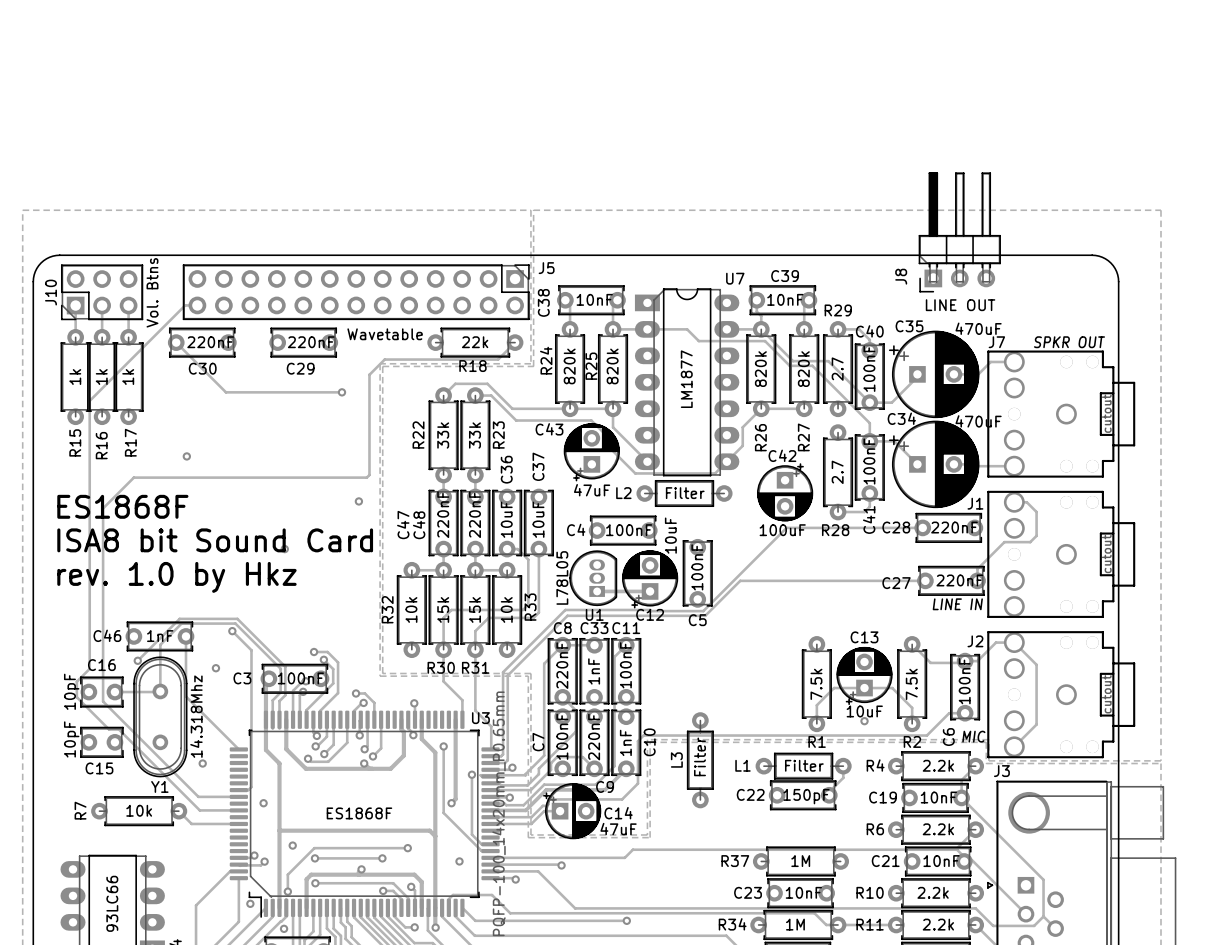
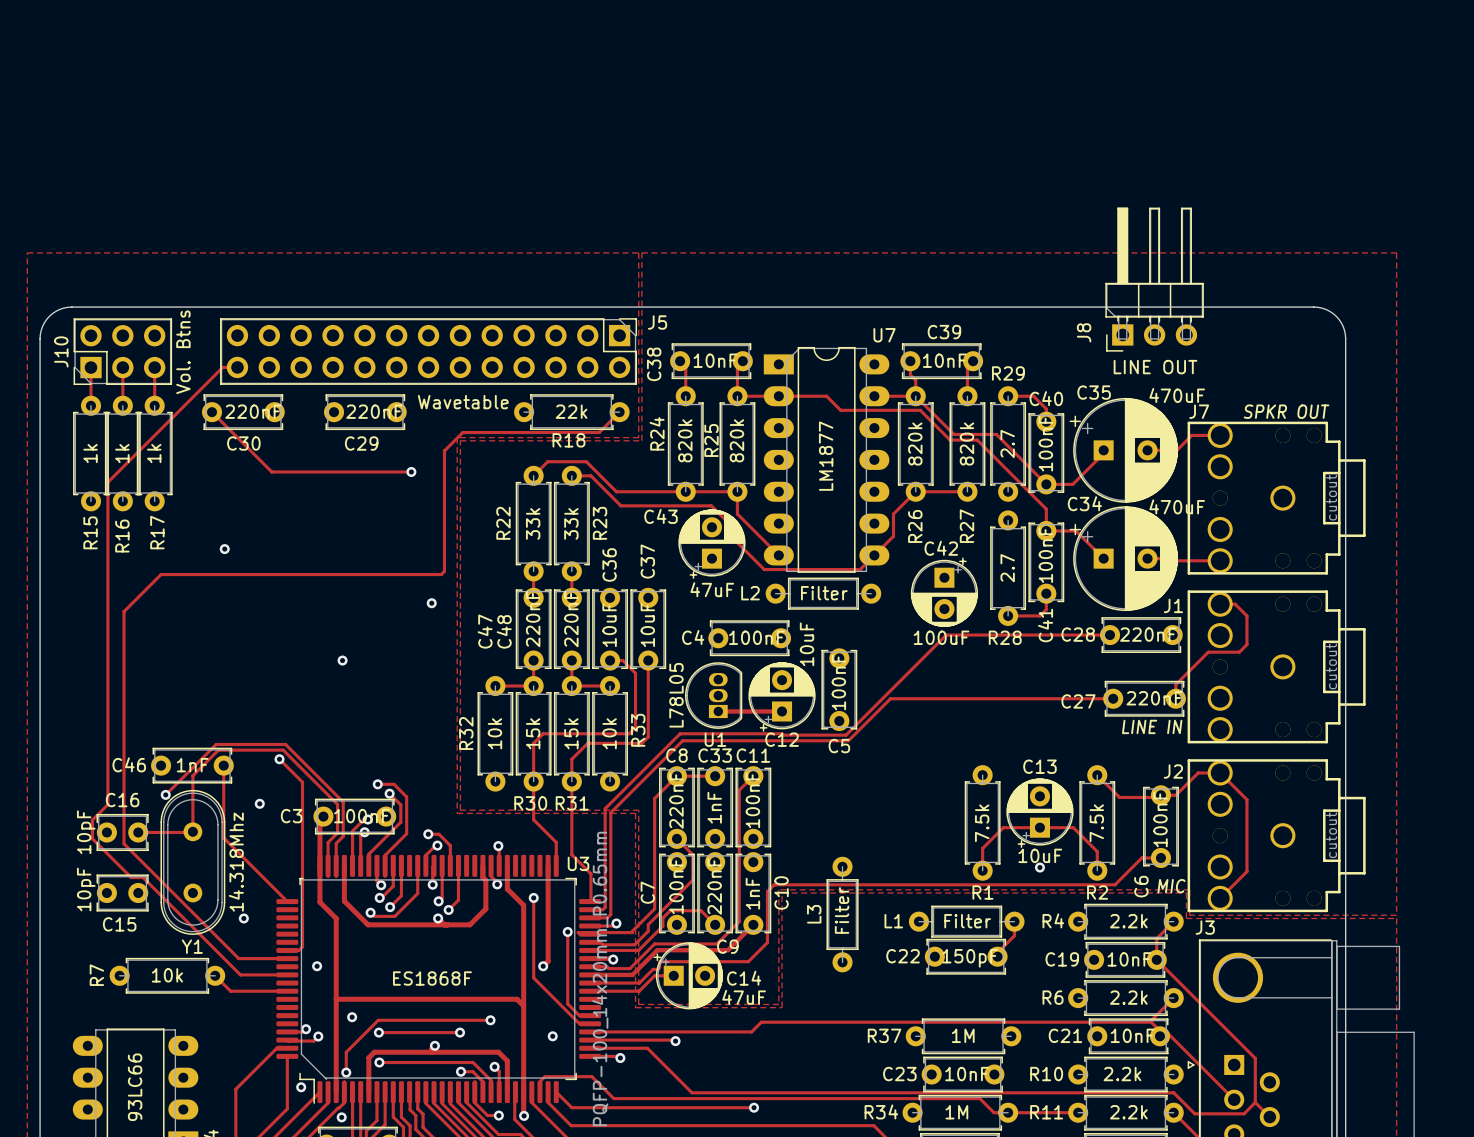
text: ES1868F (122, 506) -> none
text: ISA8 bit Sound Card (215, 540) -> none
text: rev. 1.0 by Hkz (176, 577) -> none

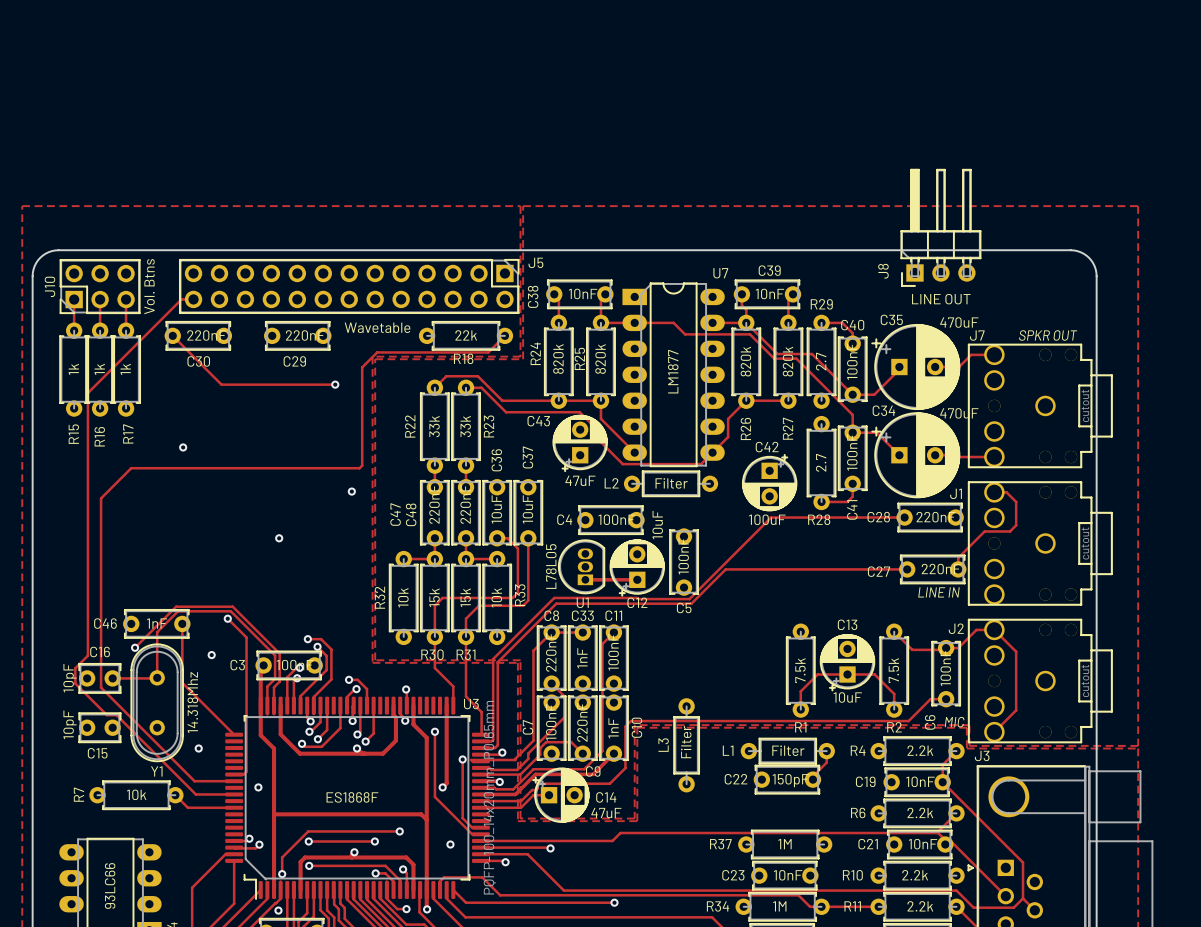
via: (1039, 867) -> none
via: (352, 1017) -> none
via: (301, 1087) -> none

